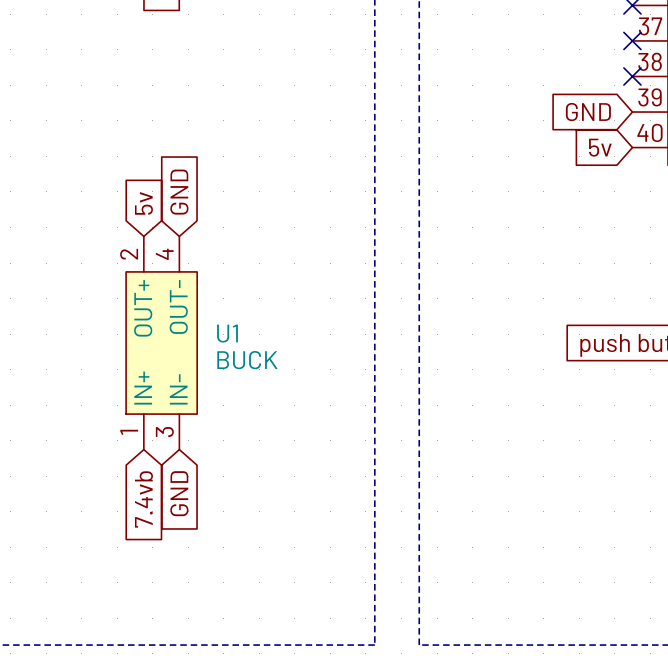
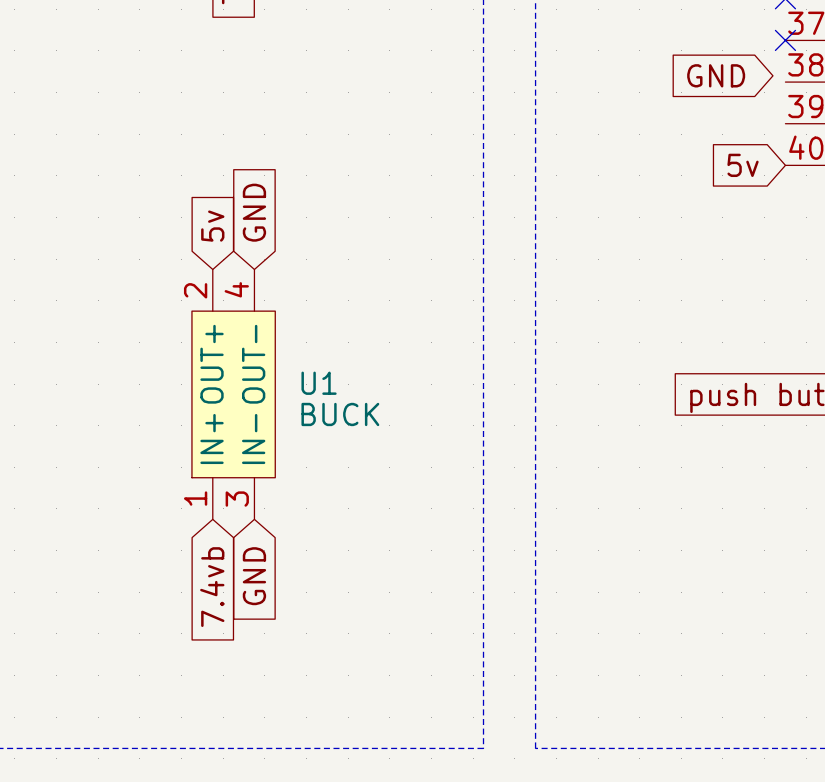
no-connect mark: (632, 76) -> none
global label position: GND (588, 112) -> GND (716, 75)

